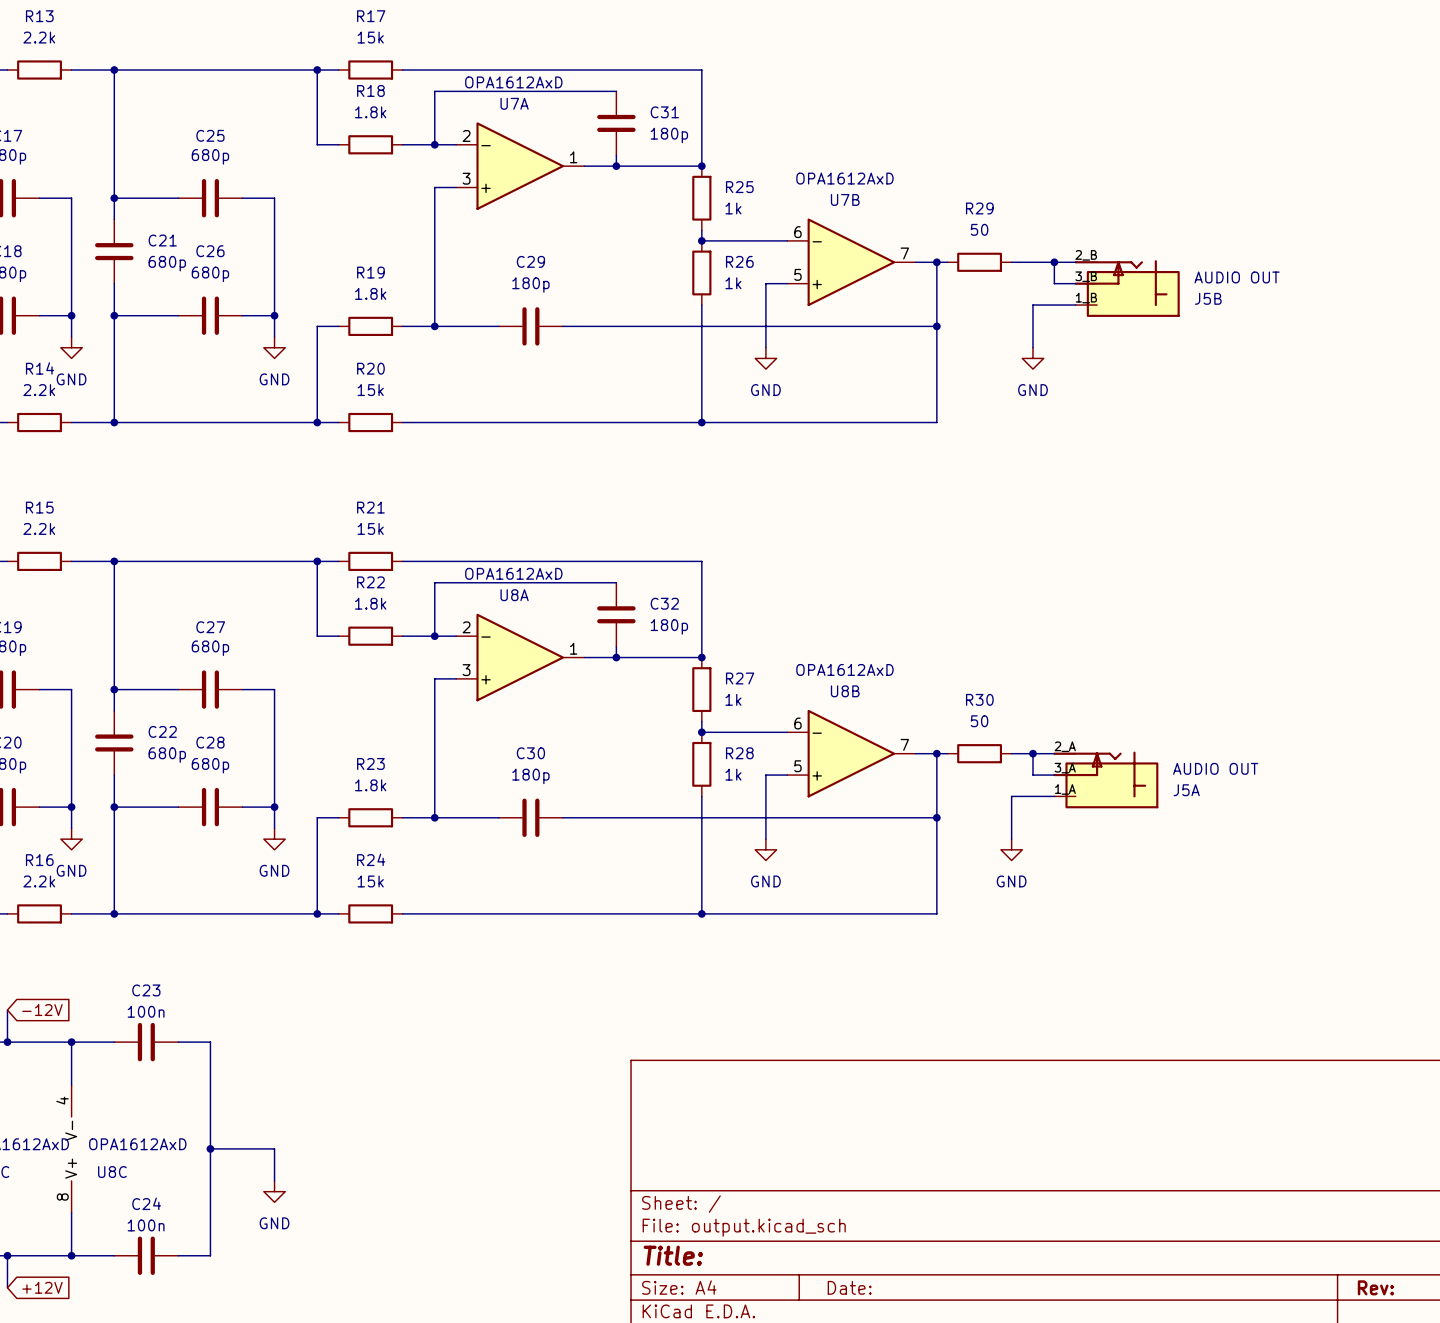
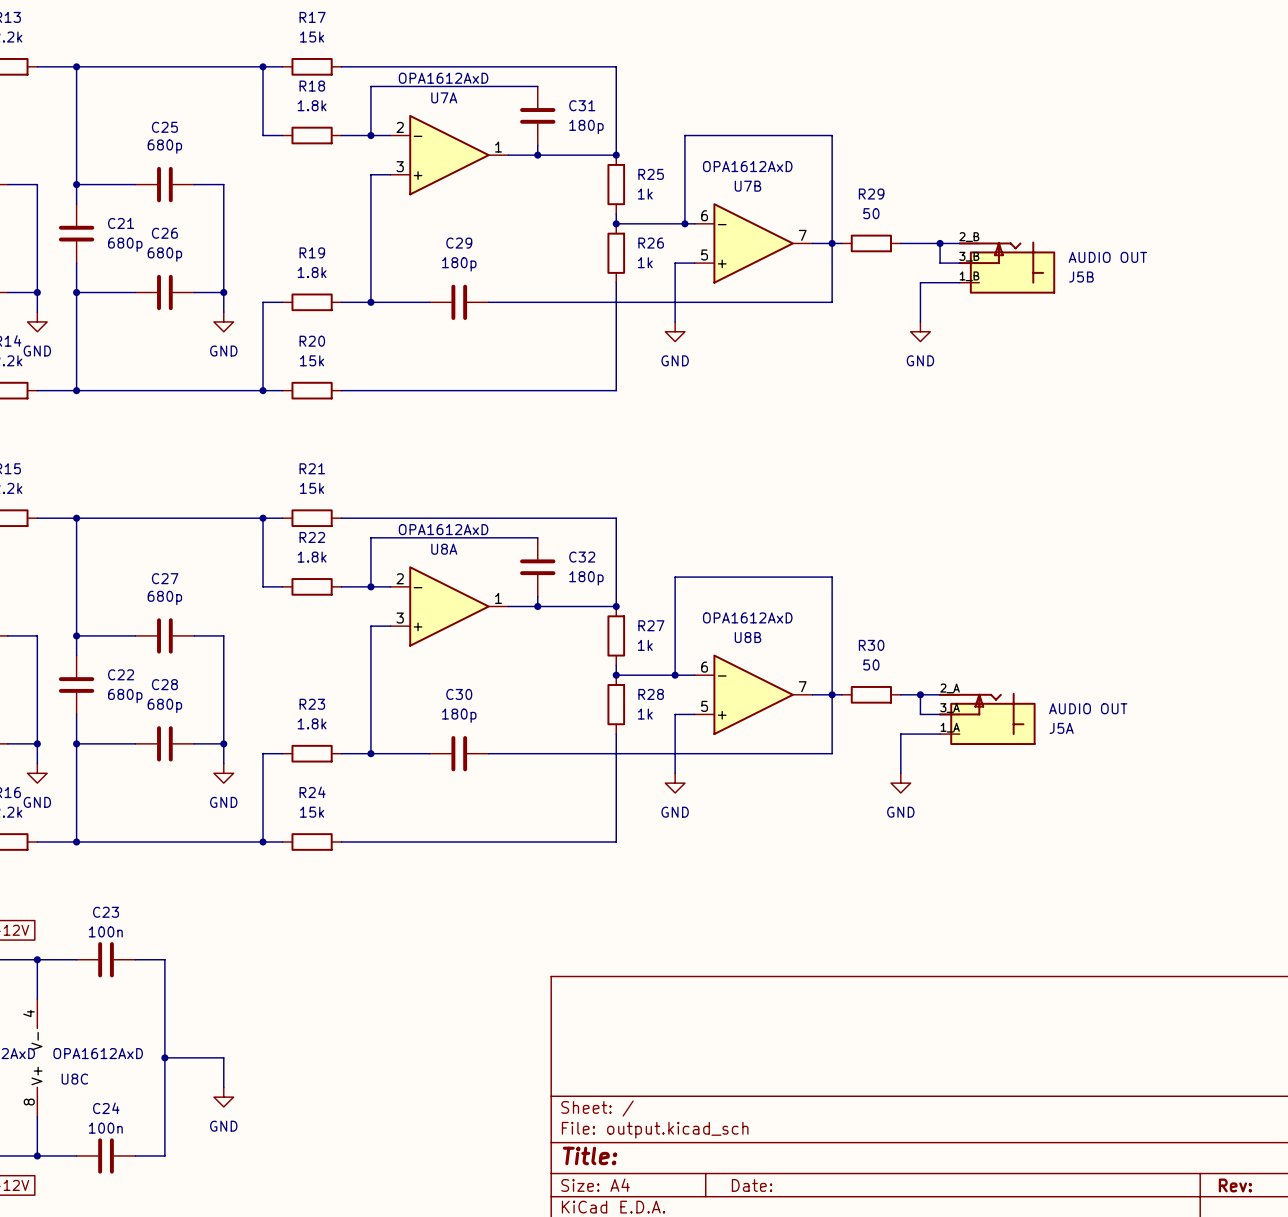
wire: none -> (684, 223) (684, 135) (832, 135) (832, 243)
junction: none -> (684, 223)
wire: (936, 326) (936, 422) (701, 422) -> none
junction: (936, 326) -> none
junction: (701, 422) -> none
wire: none -> (675, 675) (675, 577) (832, 577) (832, 694)
junction: none -> (675, 675)
wire: (936, 817) (936, 913) (701, 913) -> none
junction: (936, 817) -> none
junction: (701, 913) -> none

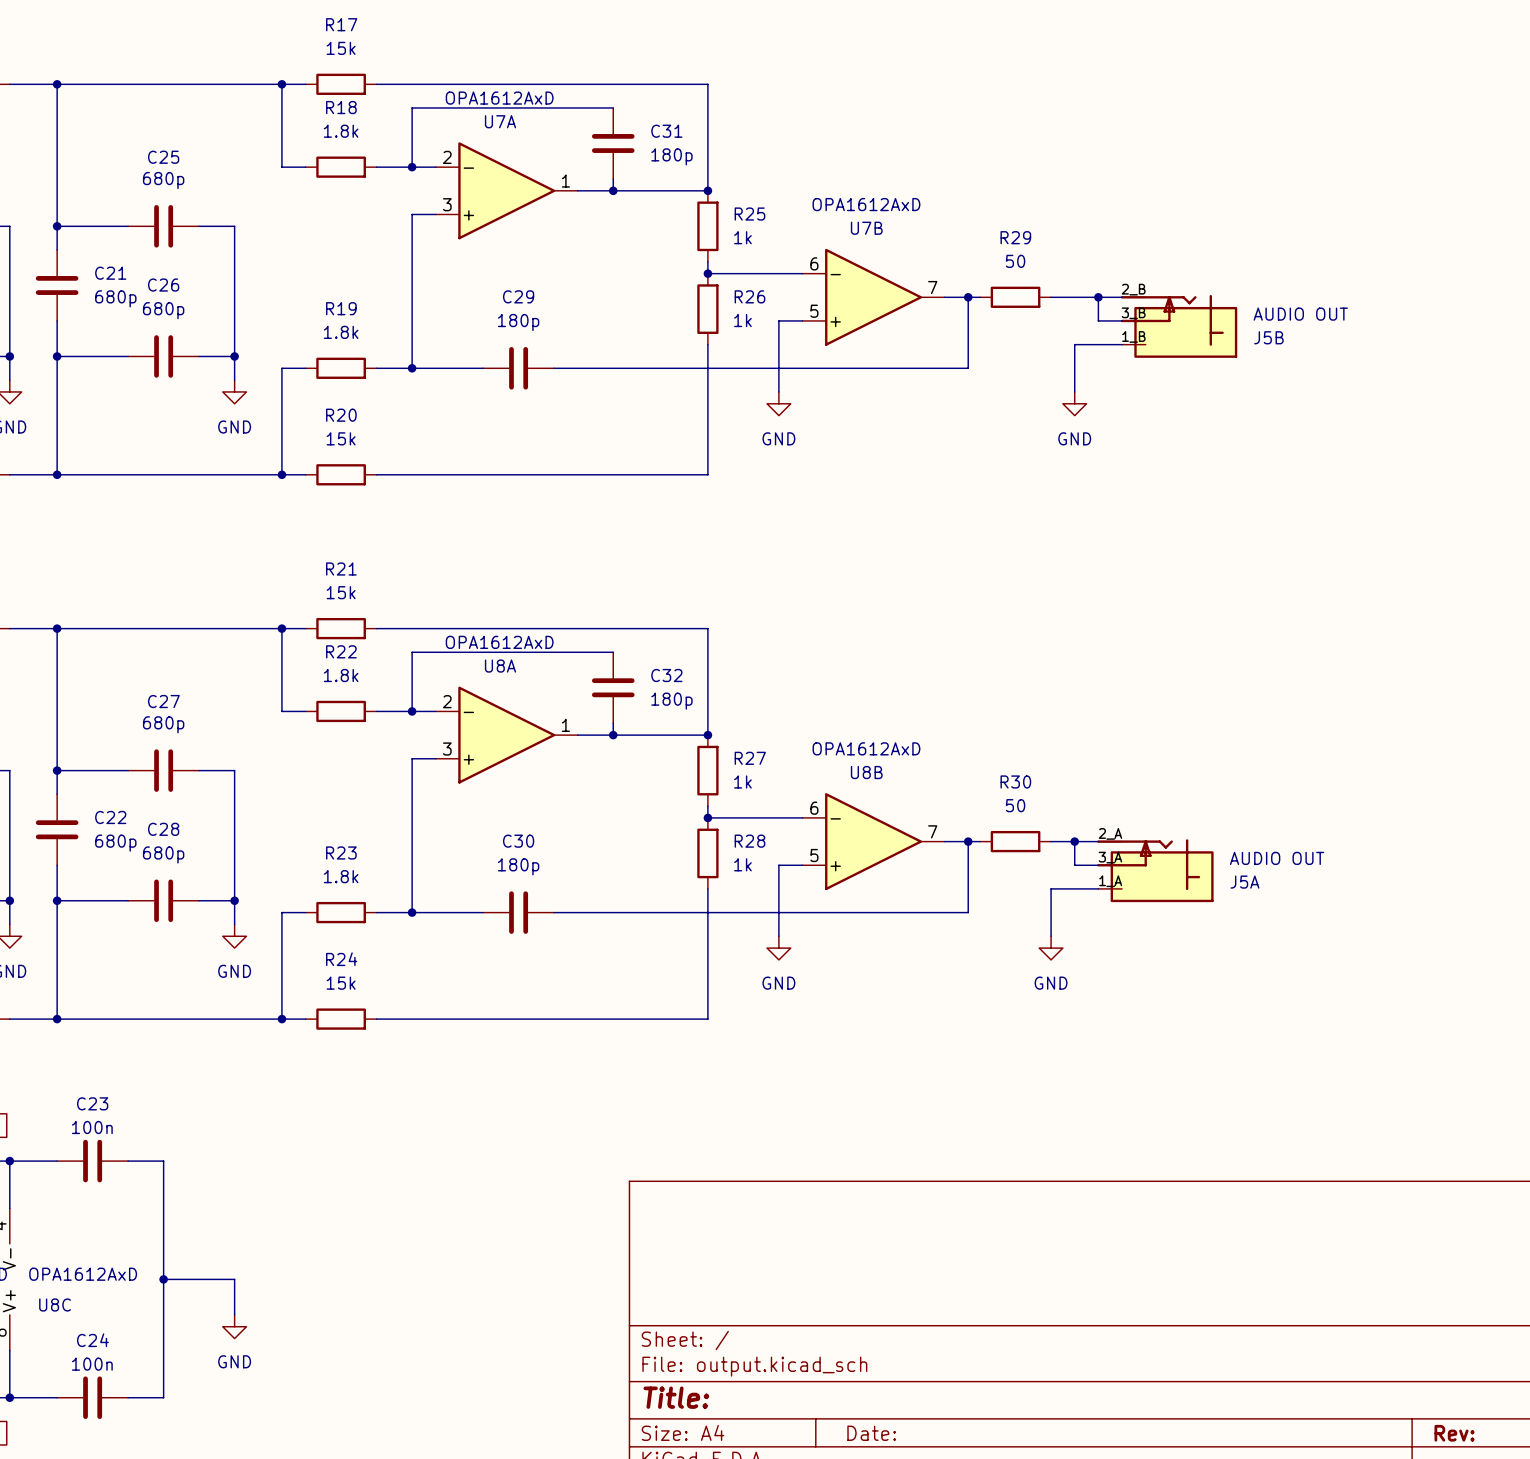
wire: (684, 223) (684, 135) (832, 135) (832, 243) -> none
junction: (684, 223) -> none
wire: (675, 675) (675, 577) (832, 577) (832, 694) -> none
junction: (675, 675) -> none

